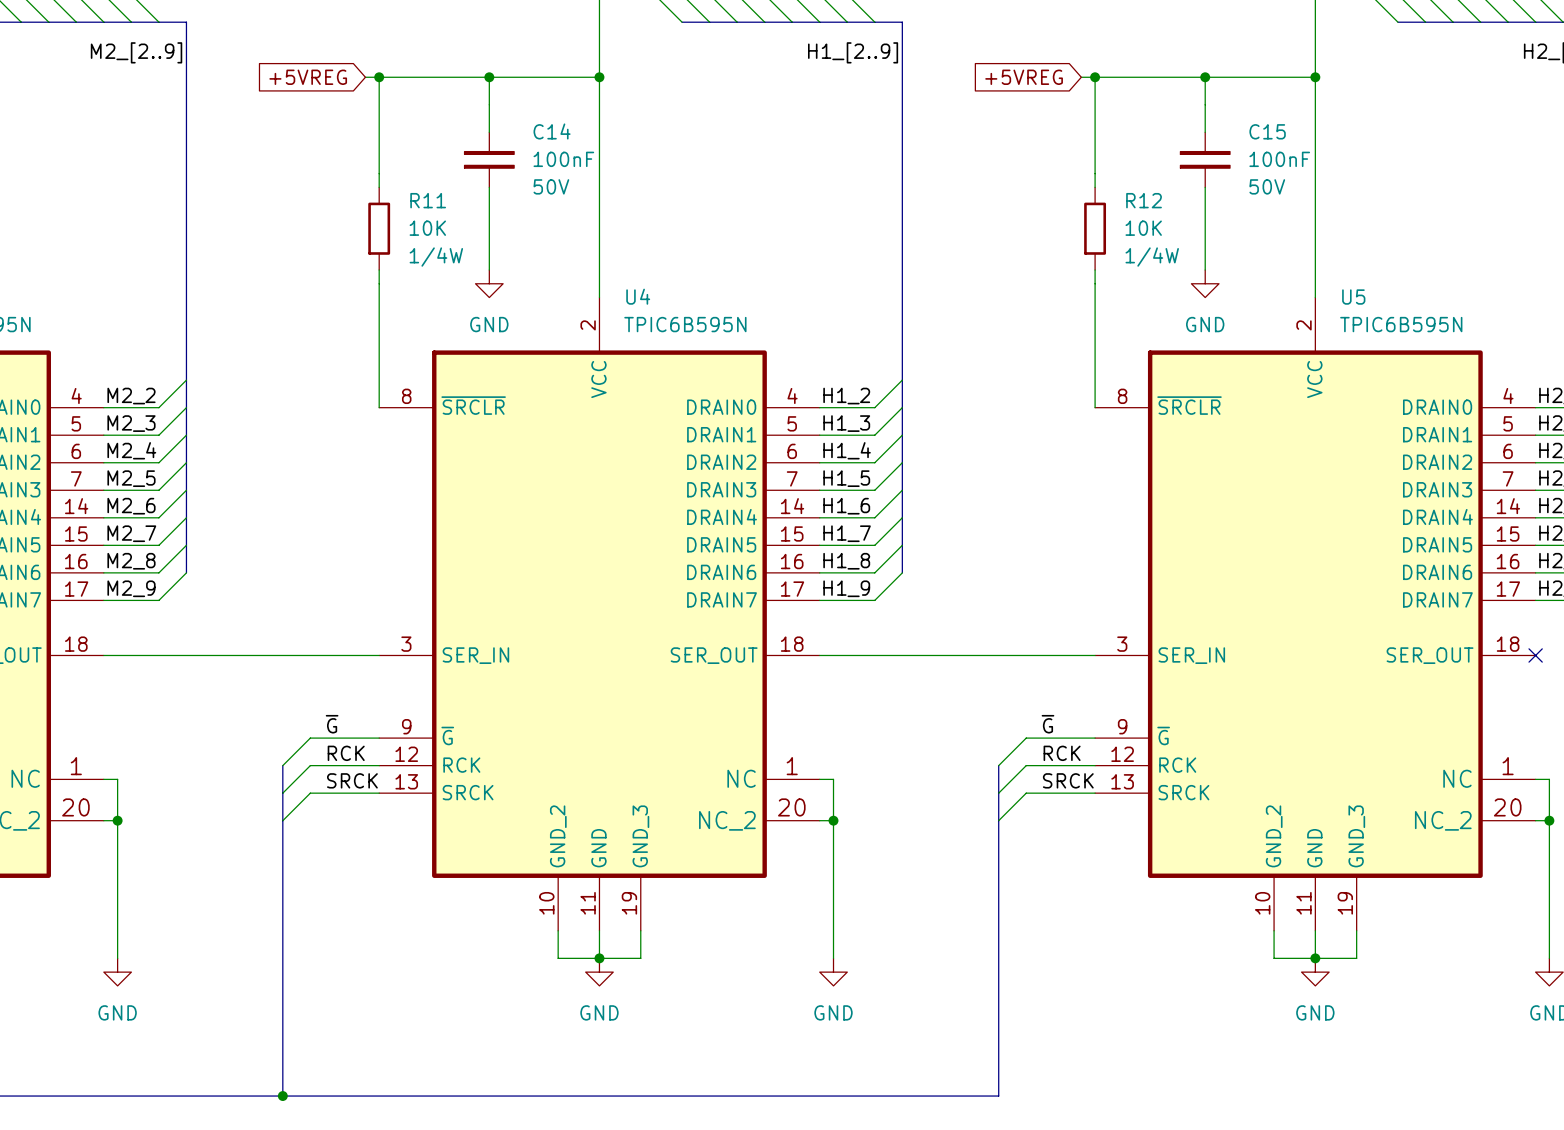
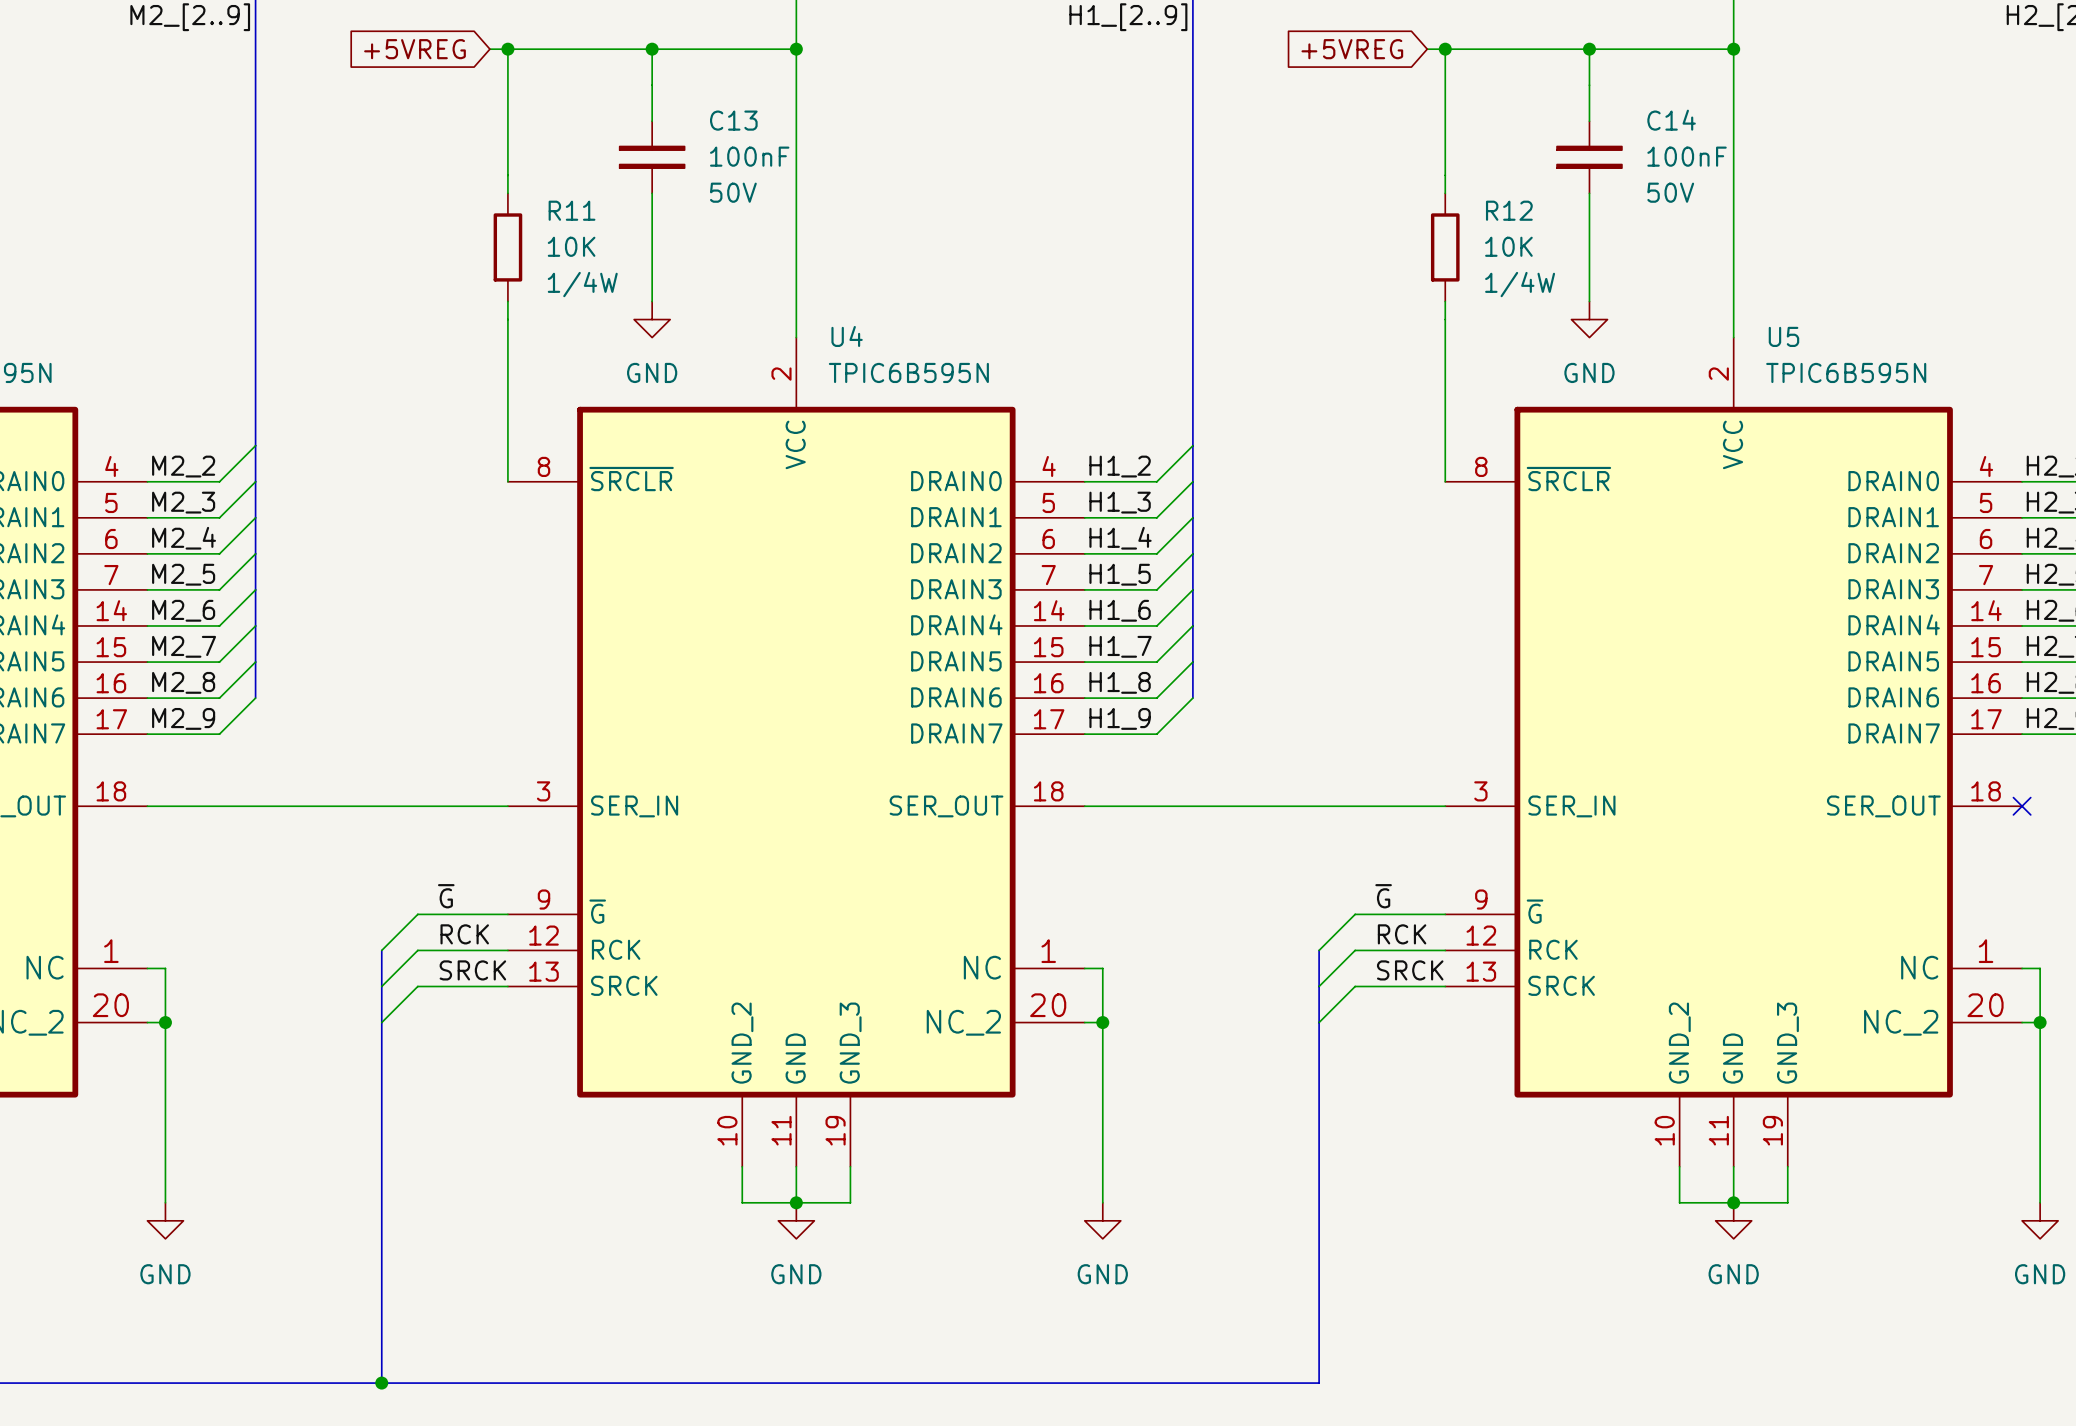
C14 name: C14 (552, 131) -> C13 (733, 120)
C15 name: C15 (1267, 131) -> C14 (1671, 120)

